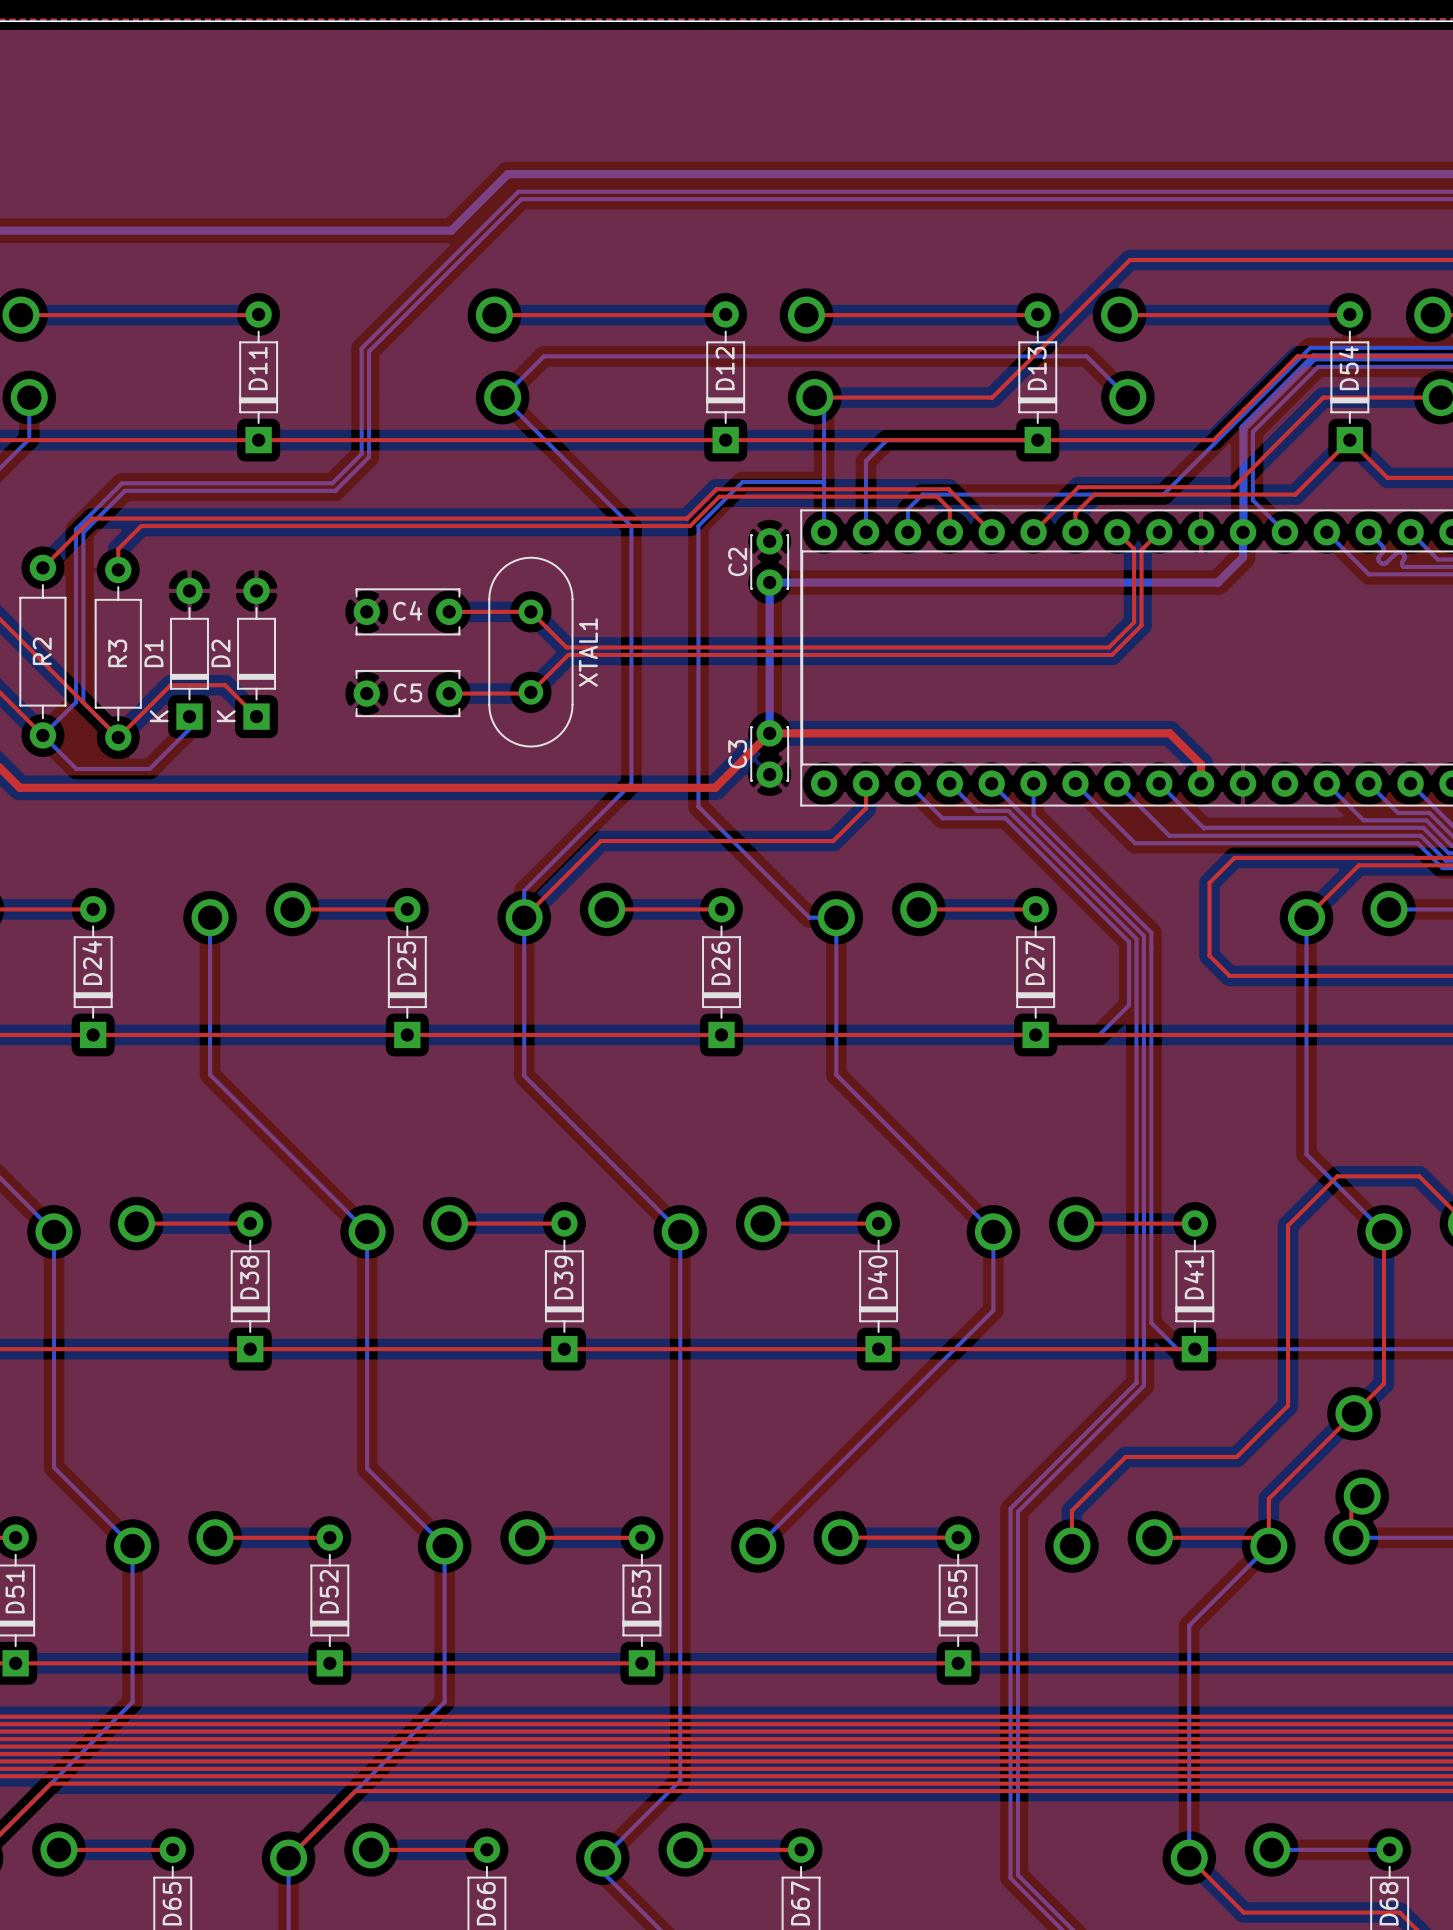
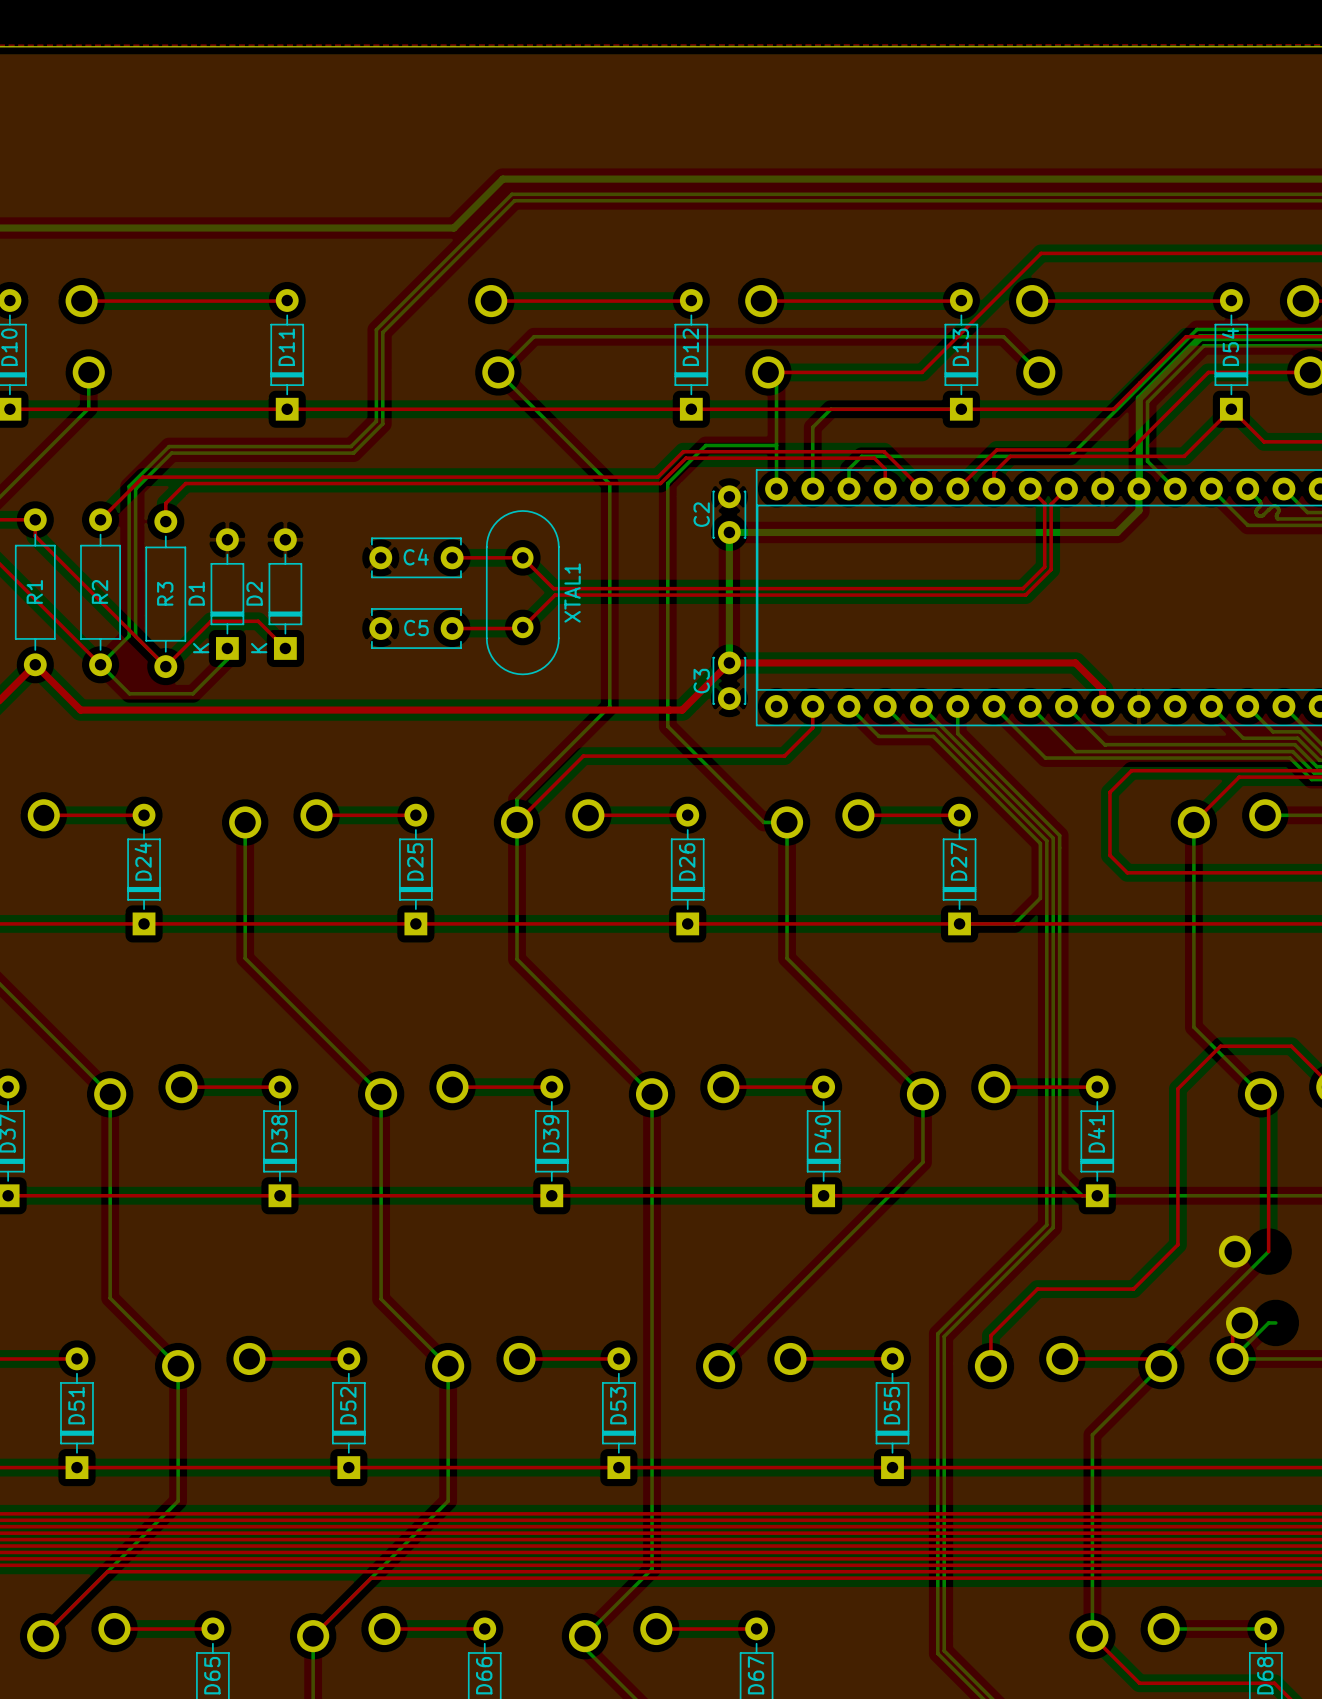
top track: (1384, 1231) (1384, 1383) (1268, 1498) (1268, 1546) -> (1260, 1094) (1268, 1101) (1268, 1251)
bottom track: none -> (1268, 1251) (1161, 1358)
bottom track: none -> (1275, 1322) (1268, 1322) (1239, 1352)

